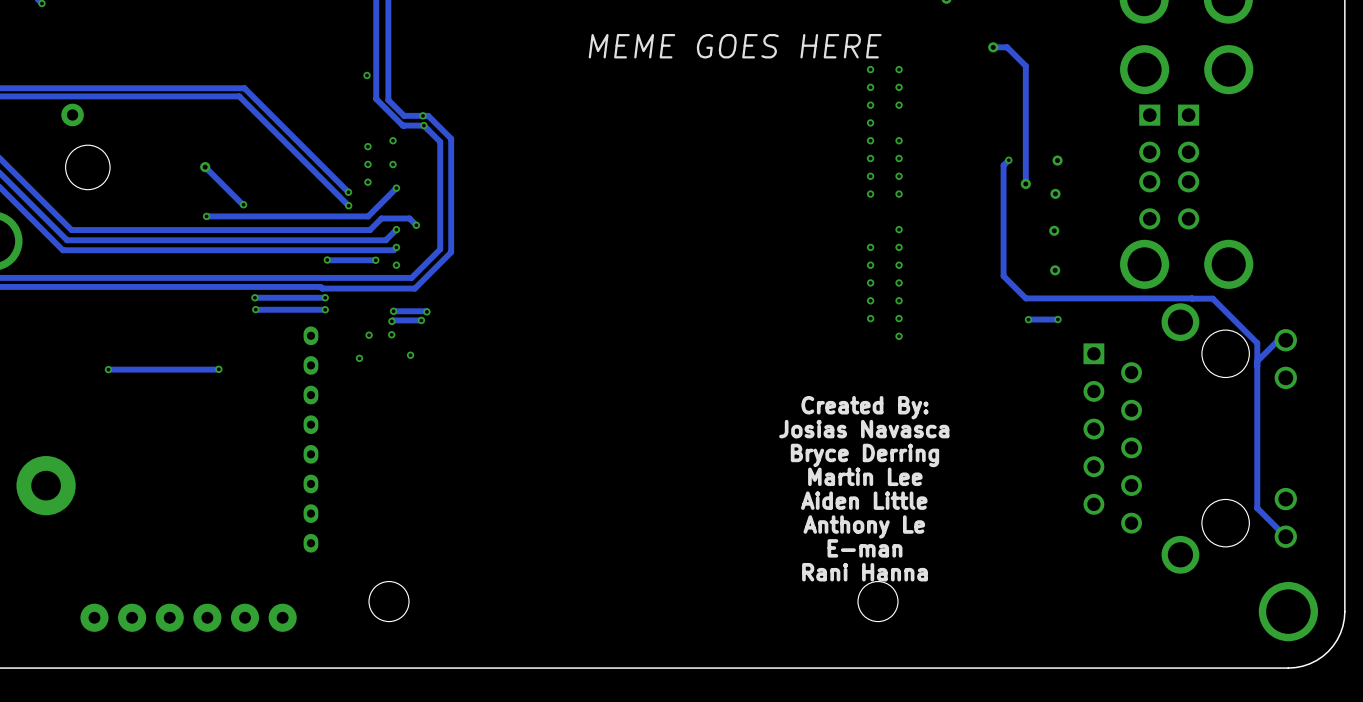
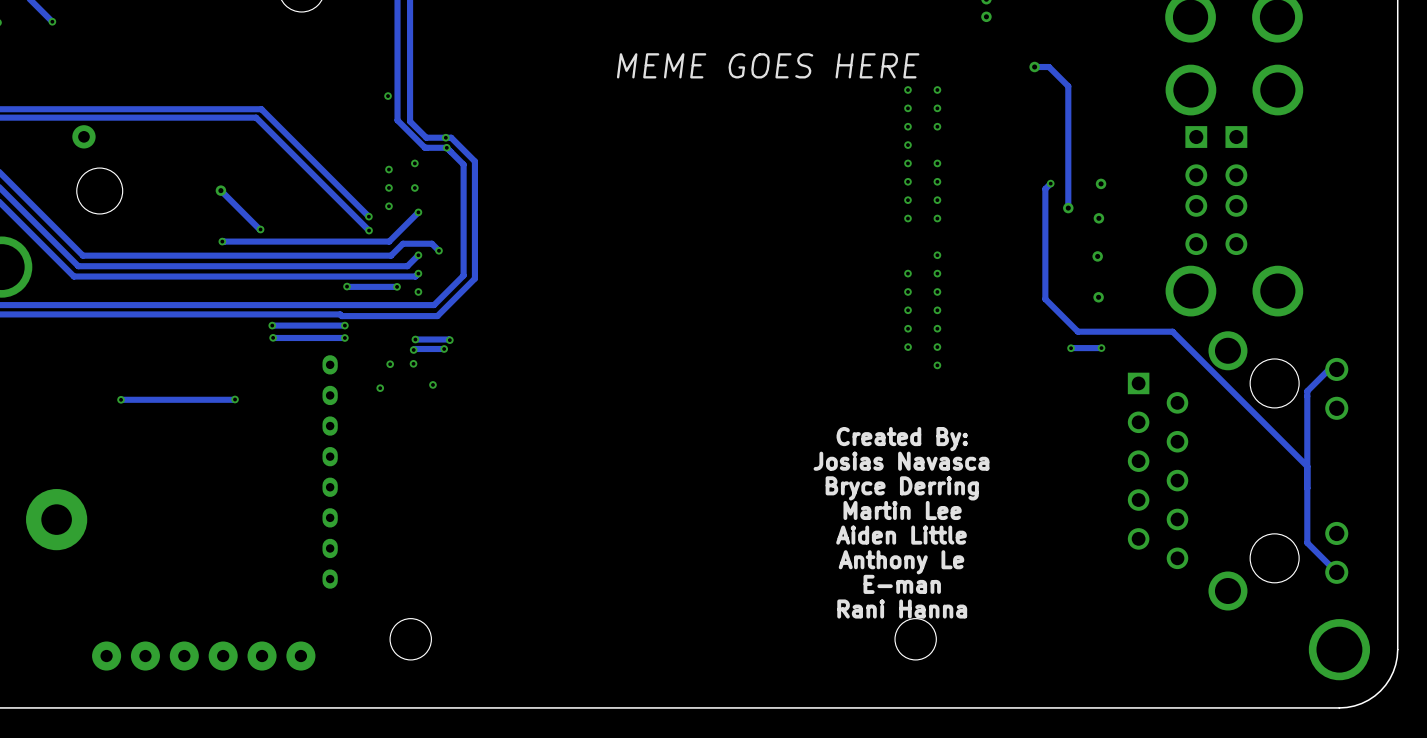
track: (1003, 272) (1003, 276) (1025, 298) (1212, 298) (1257, 343) (1257, 361) -> (1045, 299) (1077, 331) (1172, 331) (1307, 466)

